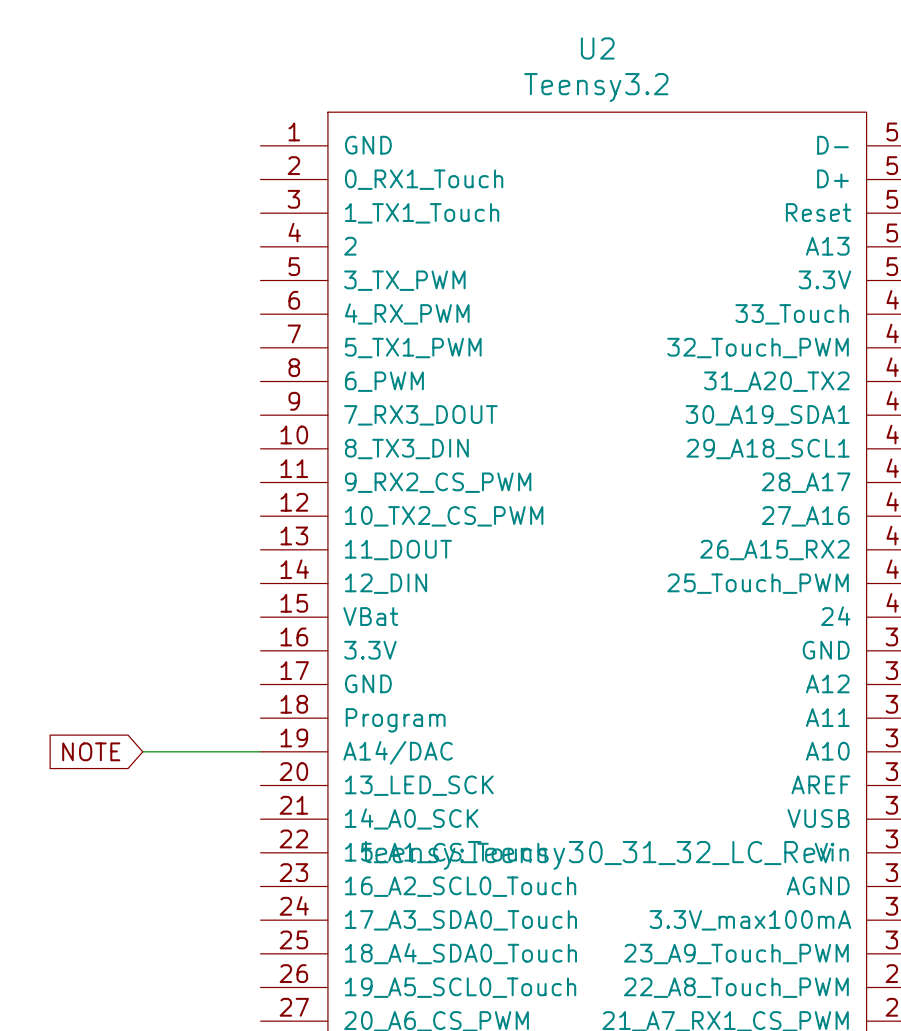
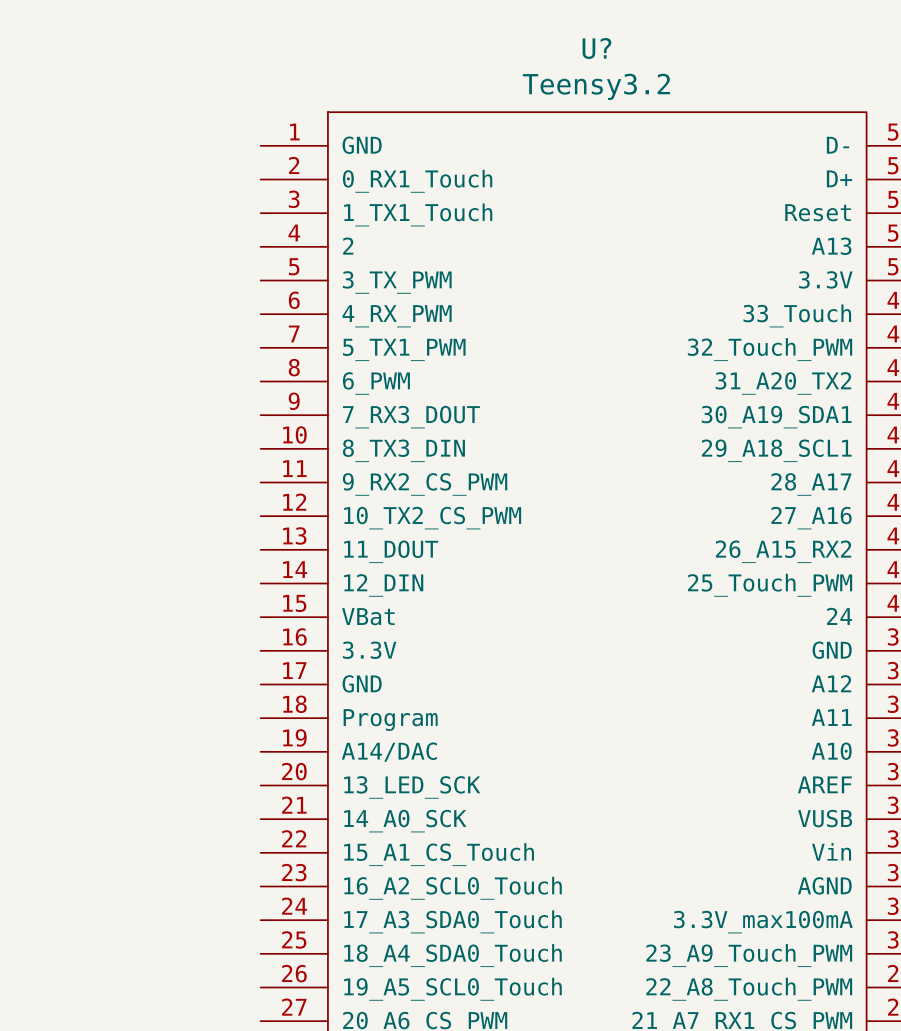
U2 name: U2 (597, 48) -> U? (596, 48)
global label: NOTE (91, 751) -> none
wire: (142, 751) (260, 751) -> none
U2 text: teensy:Teensy30_31_32_LC_Rev (596, 855) -> none

